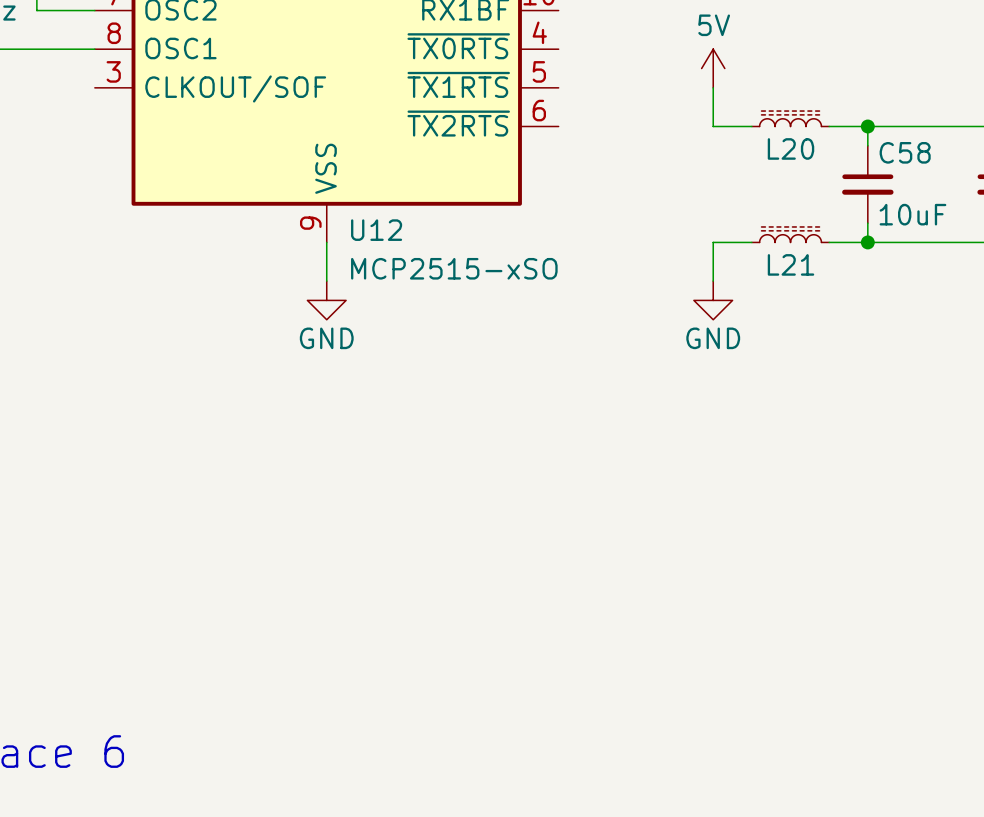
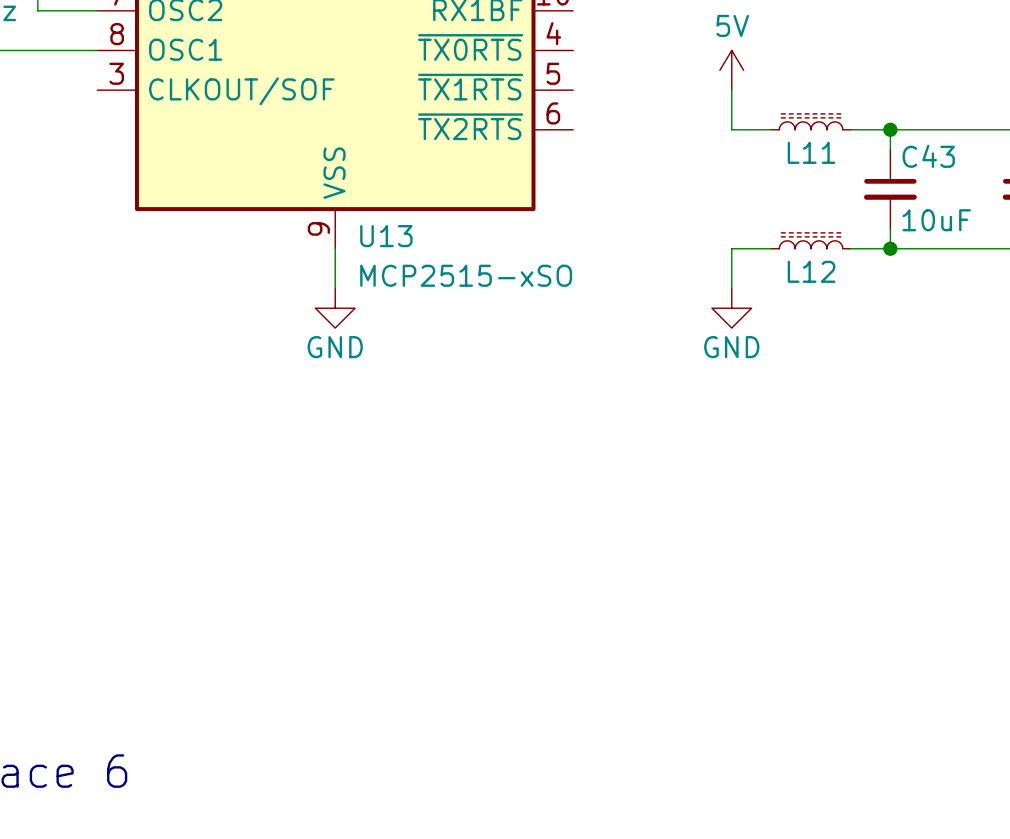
L20 name: L20 (790, 148) -> L11 (811, 152)
C58 name: C58 (905, 152) -> C43 (928, 156)
U12 name: U12 (376, 230) -> U13 (386, 236)
L21 name: L21 (790, 264) -> L12 (811, 271)

